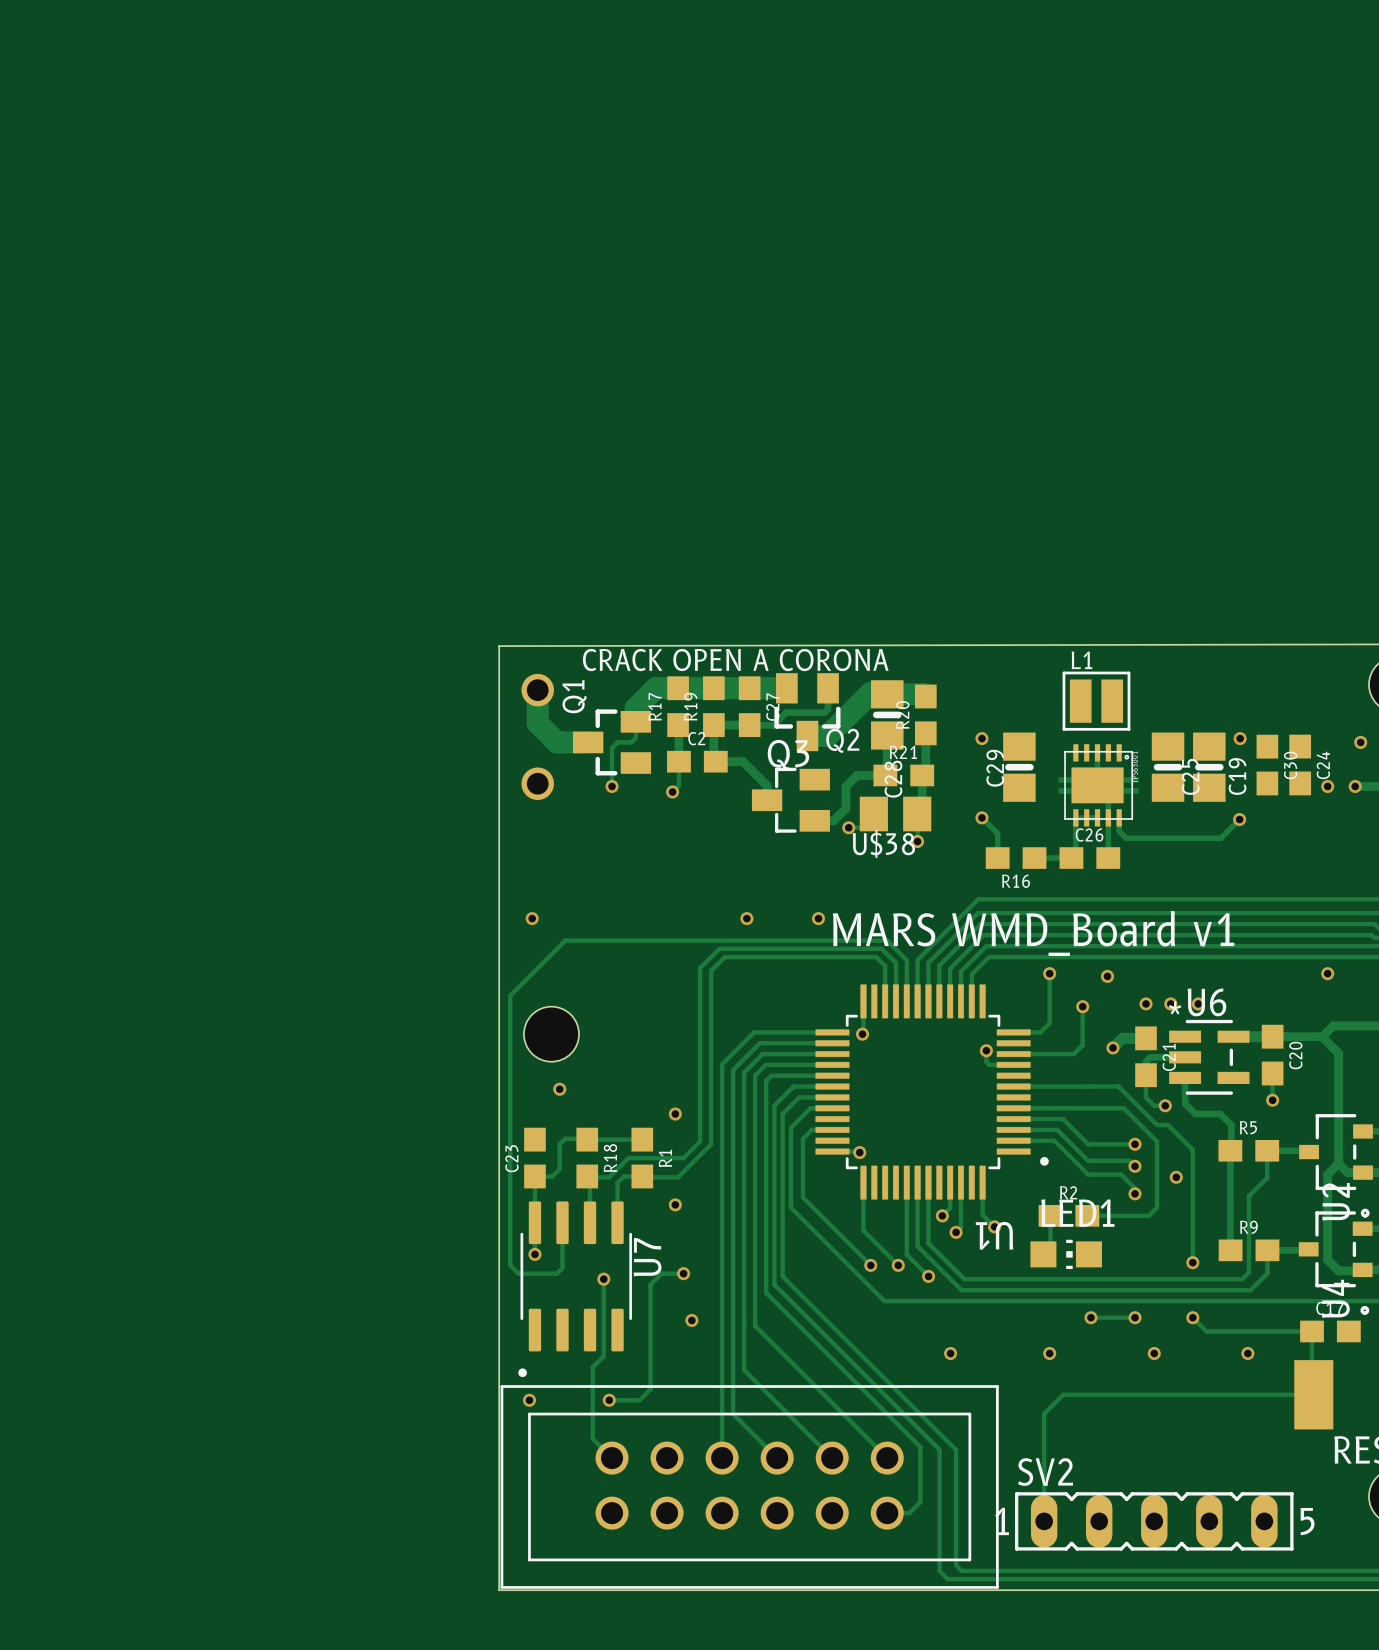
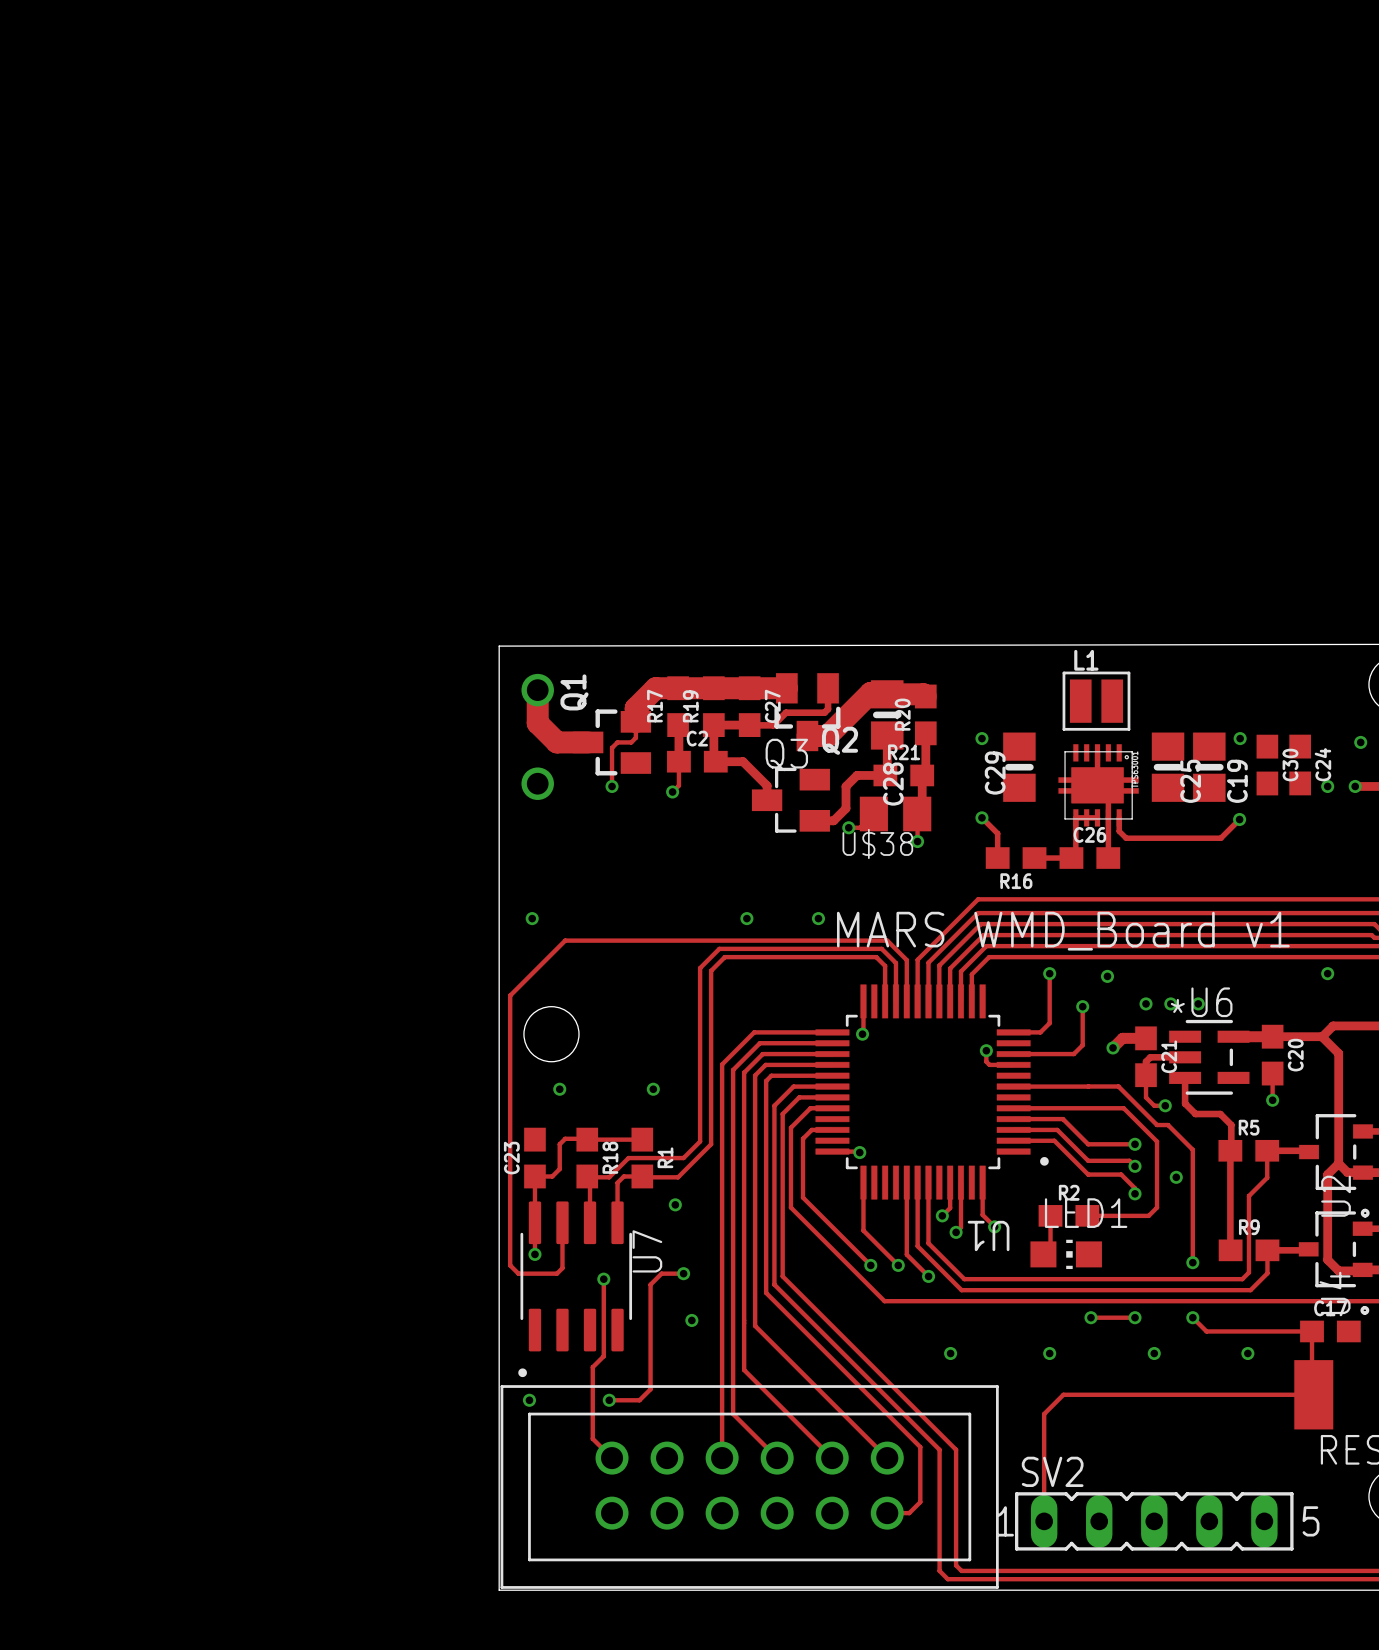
text: CRACK OPEN A CORONA (735, 659) -> none
via position: (675, 1114) -> (653, 1089)

